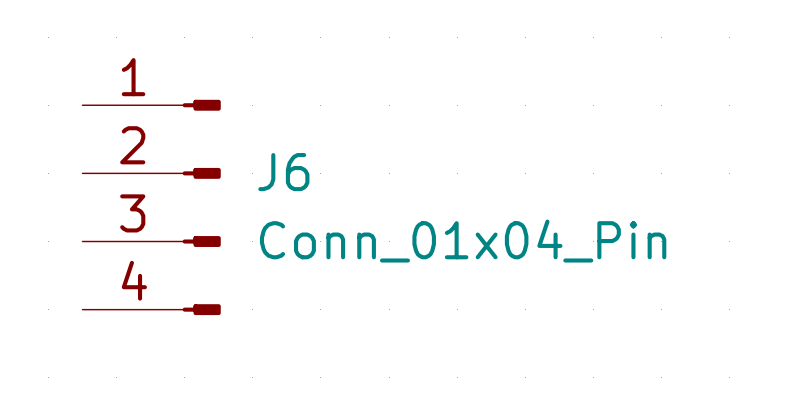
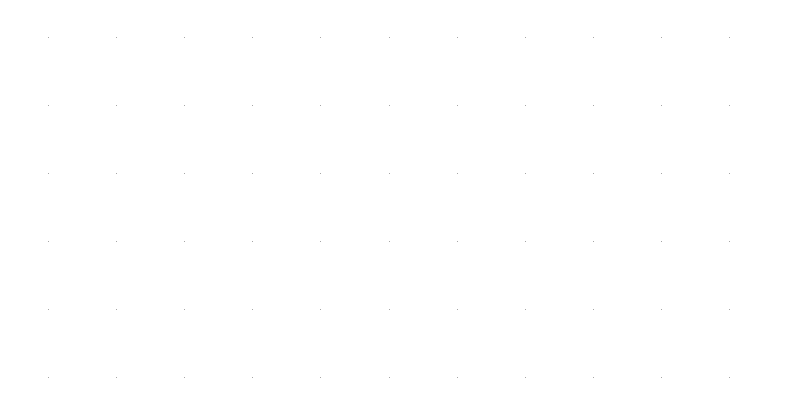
J6: Conn_01x04_Pin (151, 207) -> none

